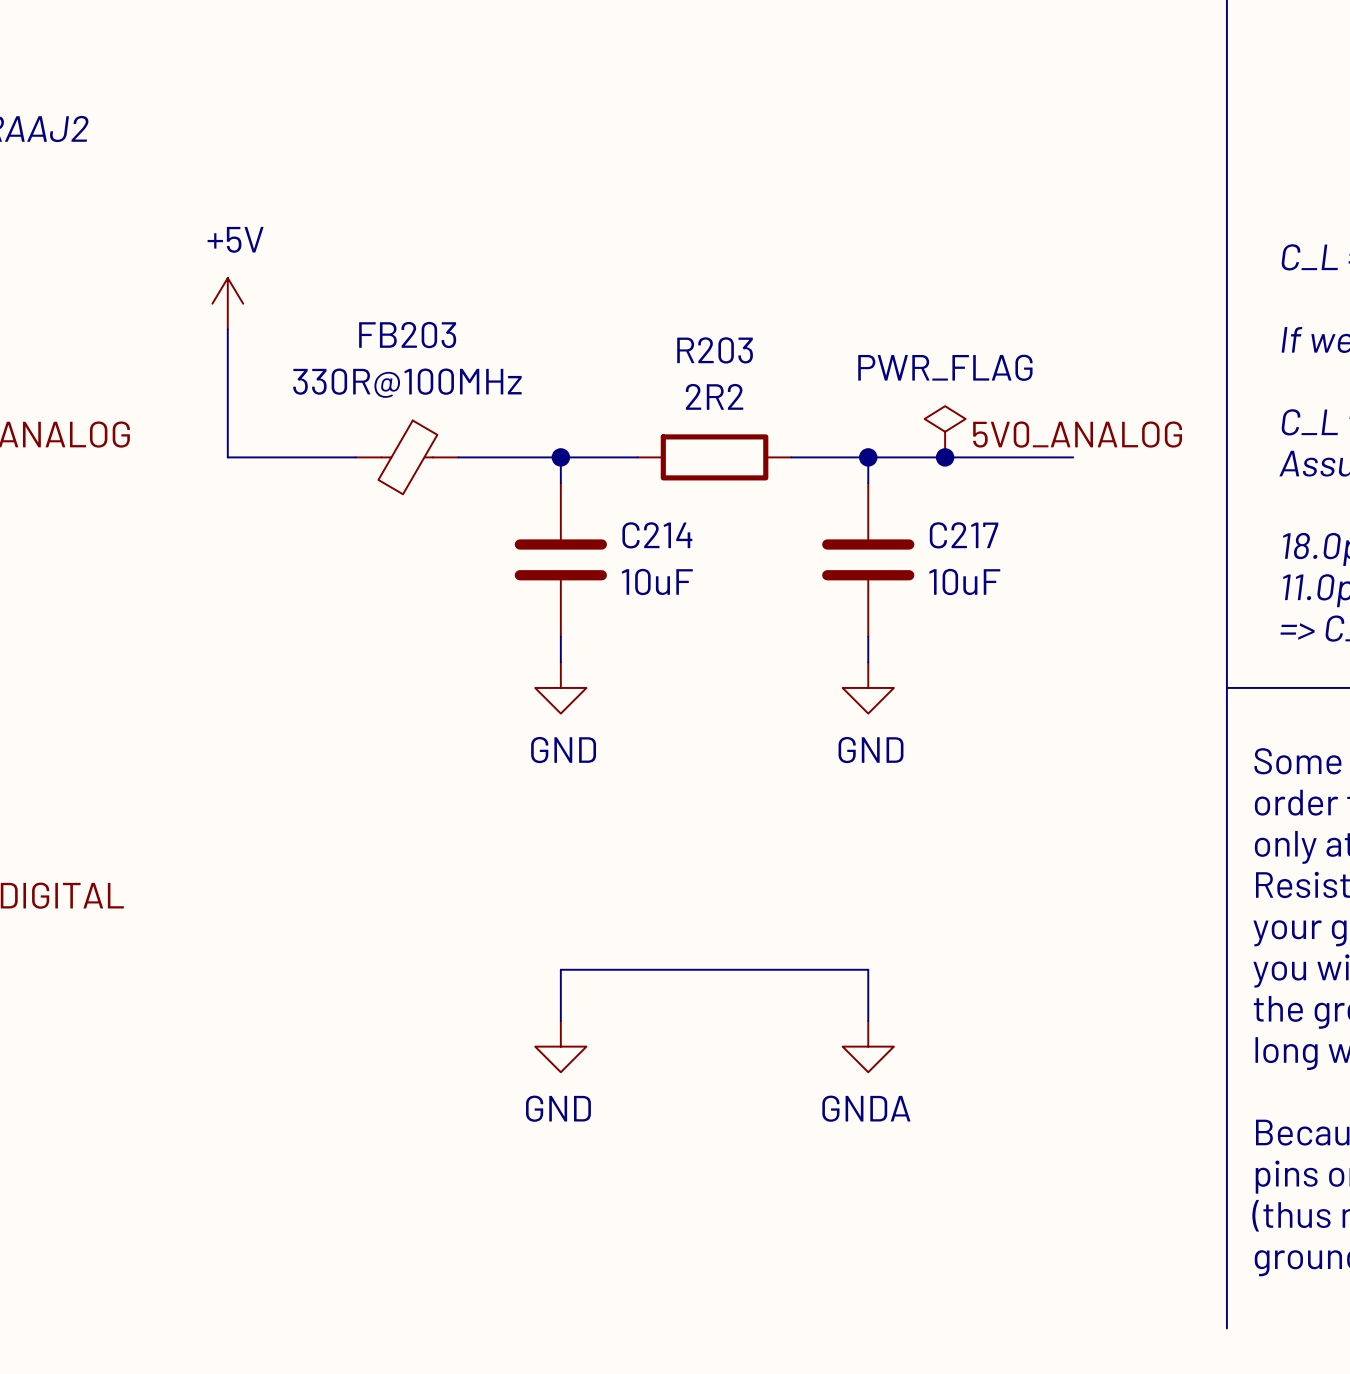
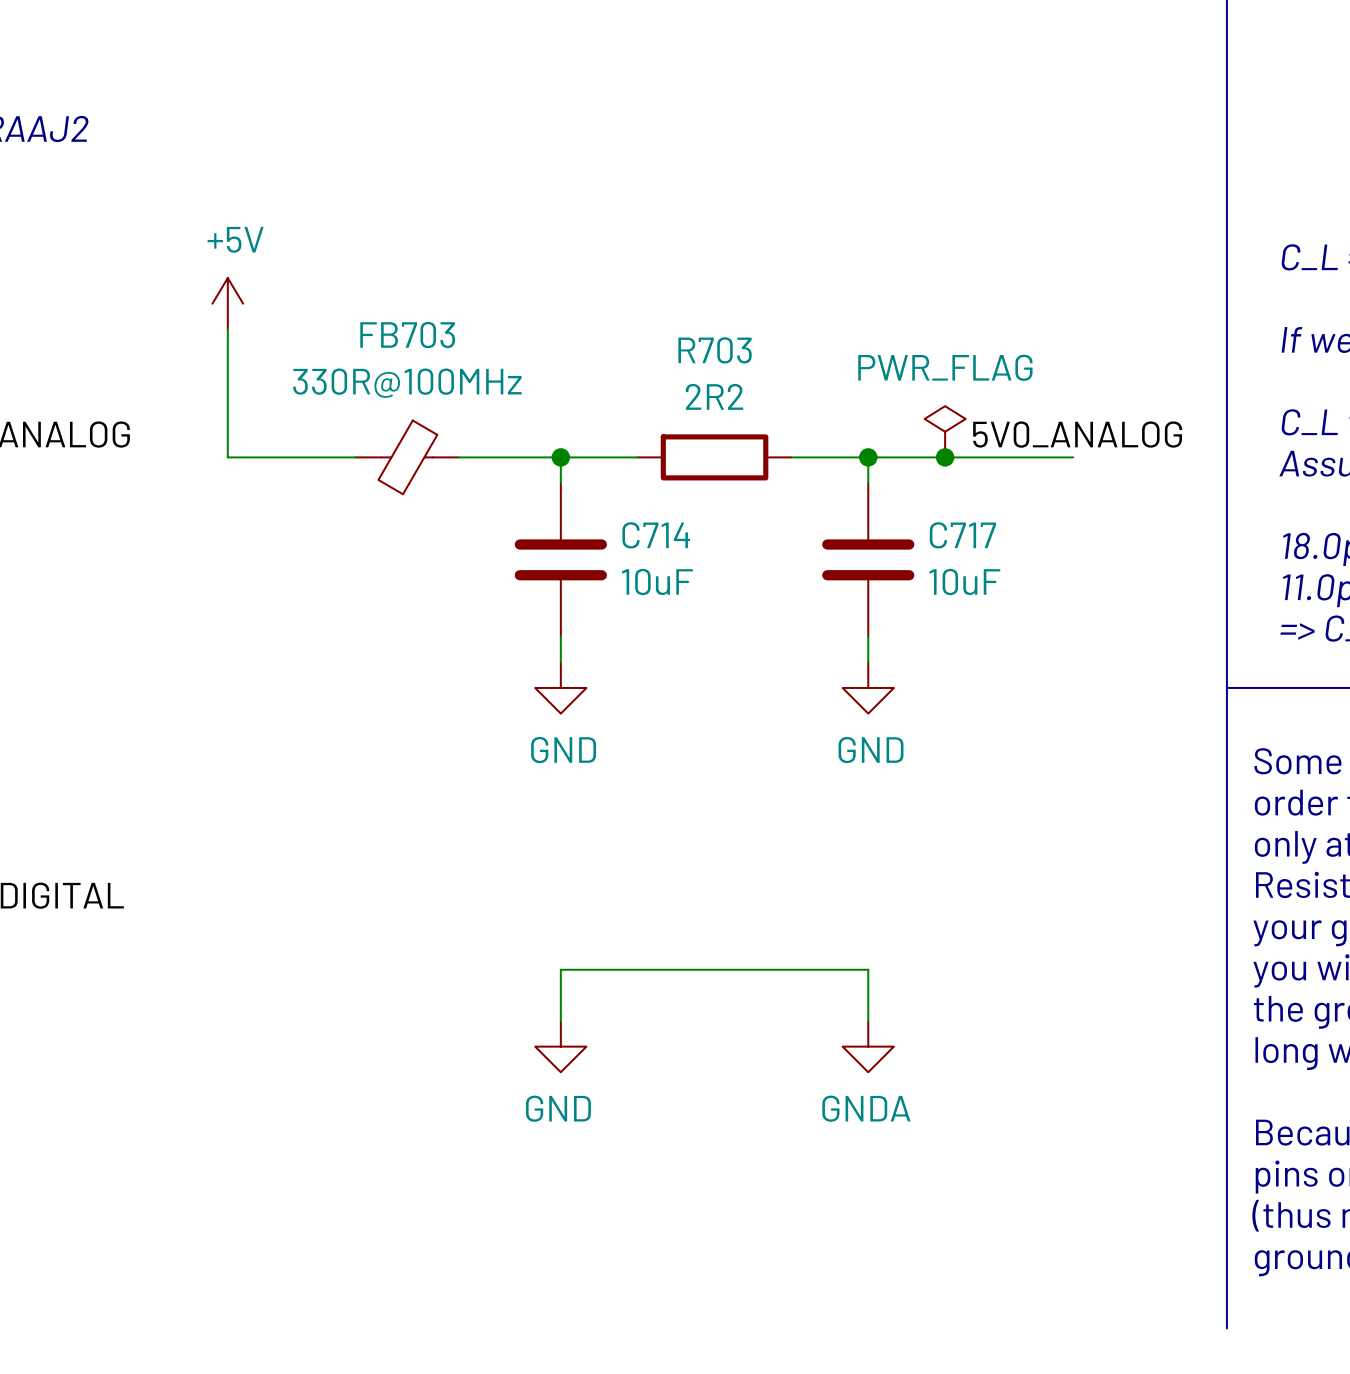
FB203 name: FB203 (407, 335) -> FB703 (407, 335)
R203 name: R203 (715, 350) -> R703 (715, 350)
C214 name: C214 (657, 535) -> C714 (656, 535)
C217 name: C217 (964, 535) -> C717 (962, 535)

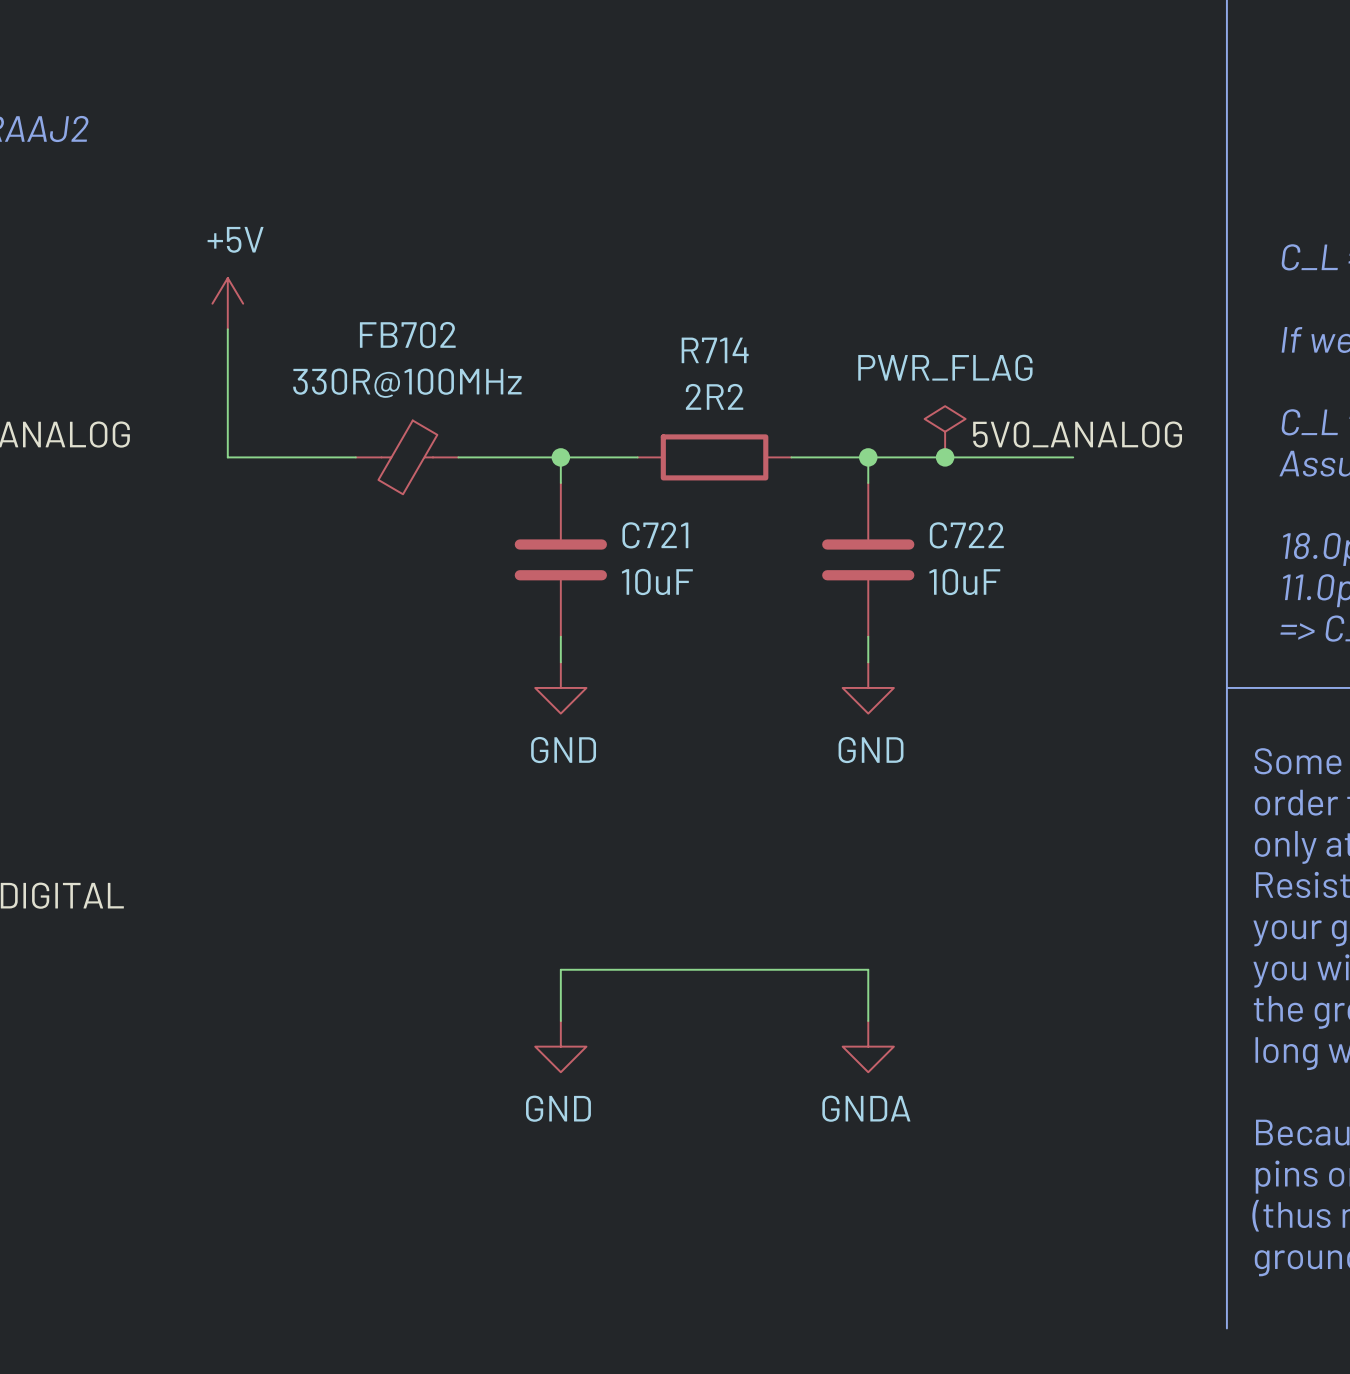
FB703 name: FB703 (407, 335) -> FB702 (407, 335)
R703 name: R703 (715, 350) -> R714 (715, 350)
C714 name: C714 (656, 535) -> C721 (655, 535)
C717 name: C717 (962, 535) -> C722 (966, 535)

